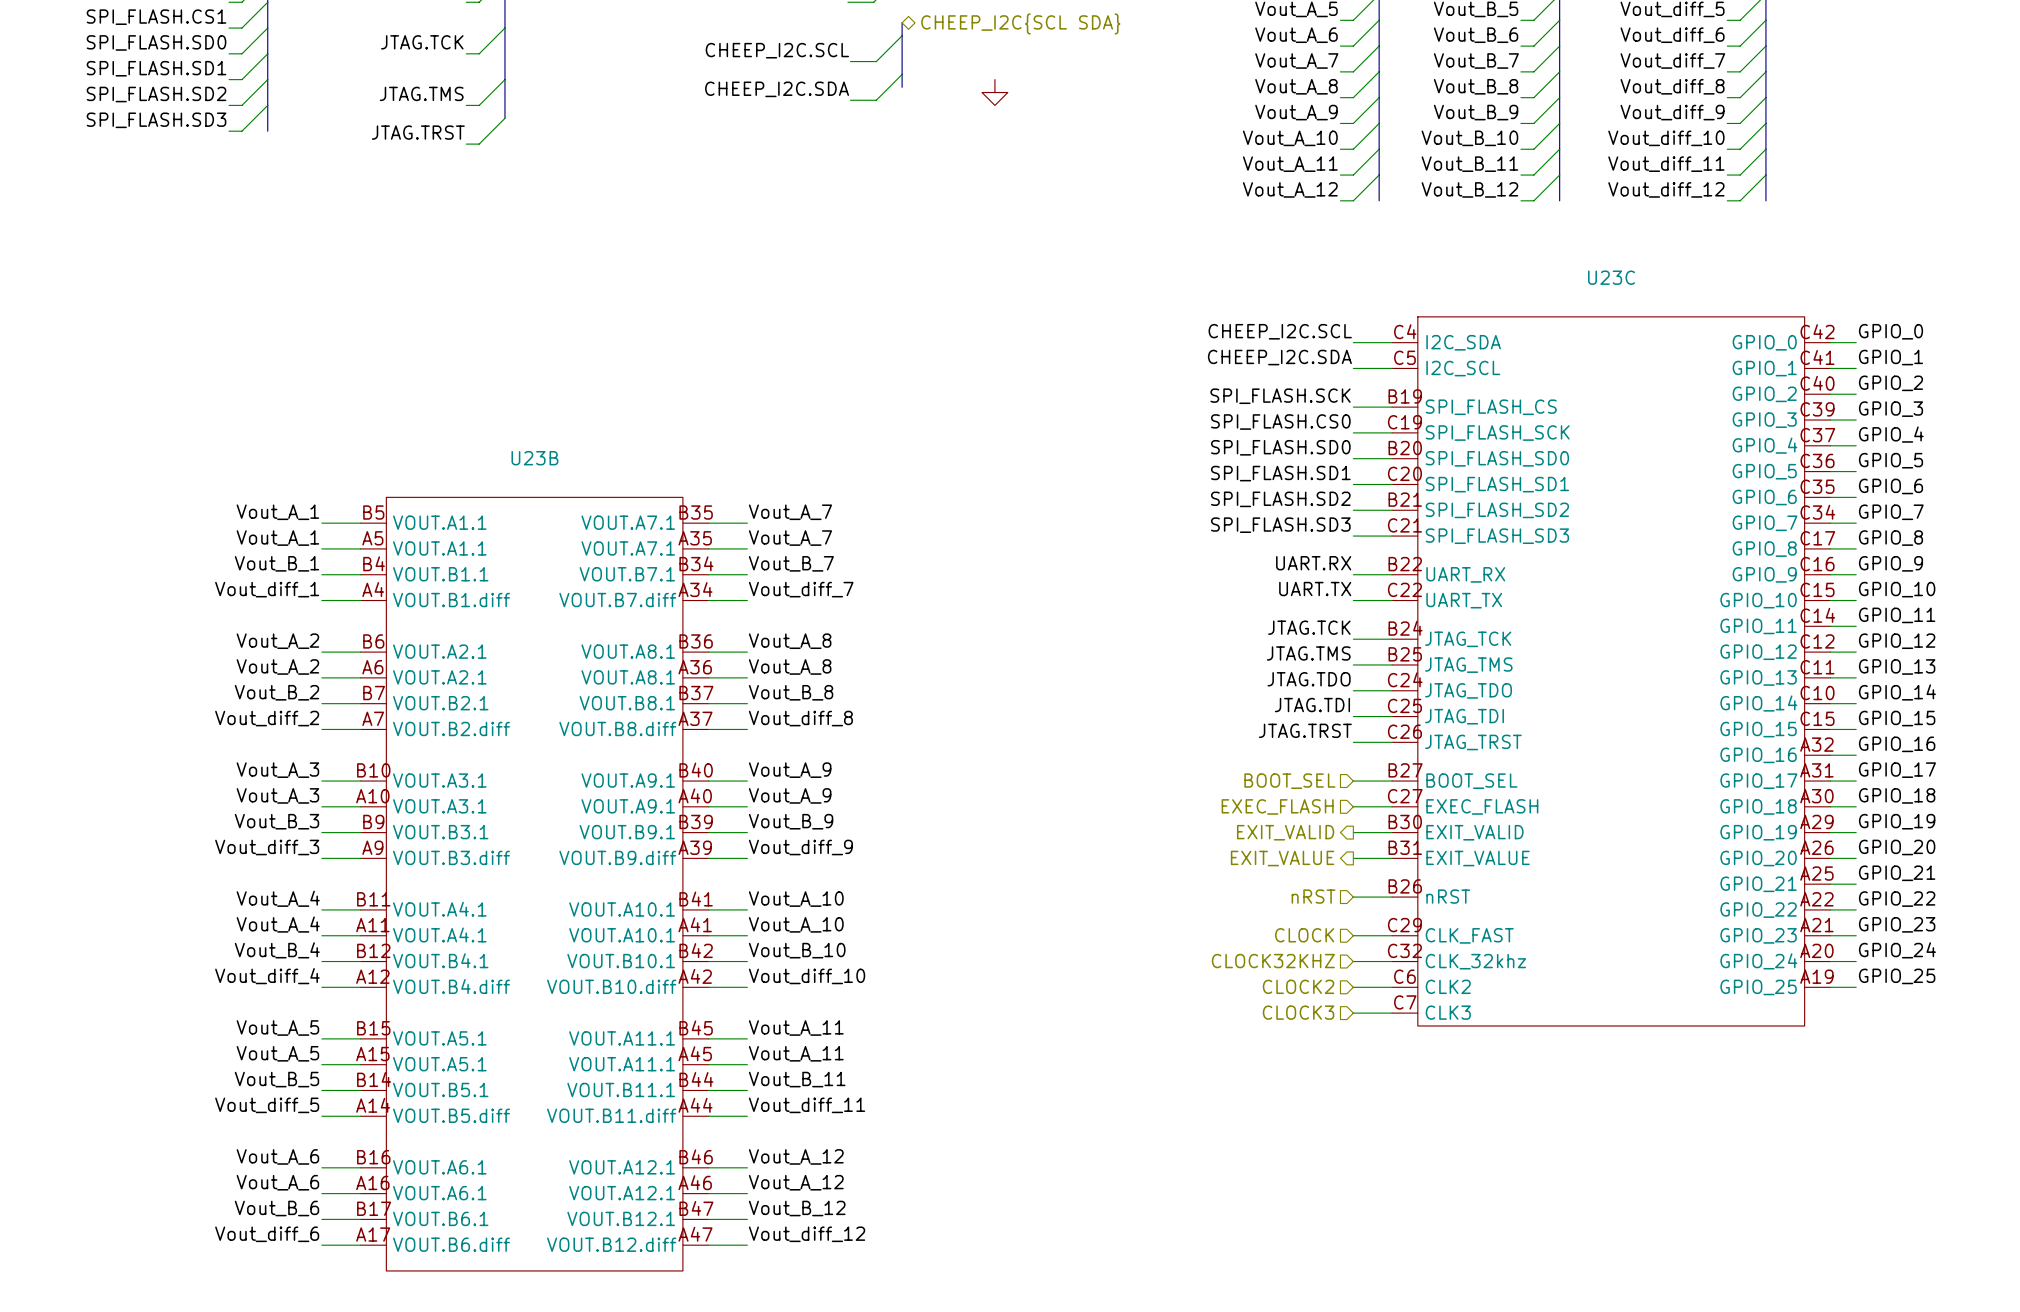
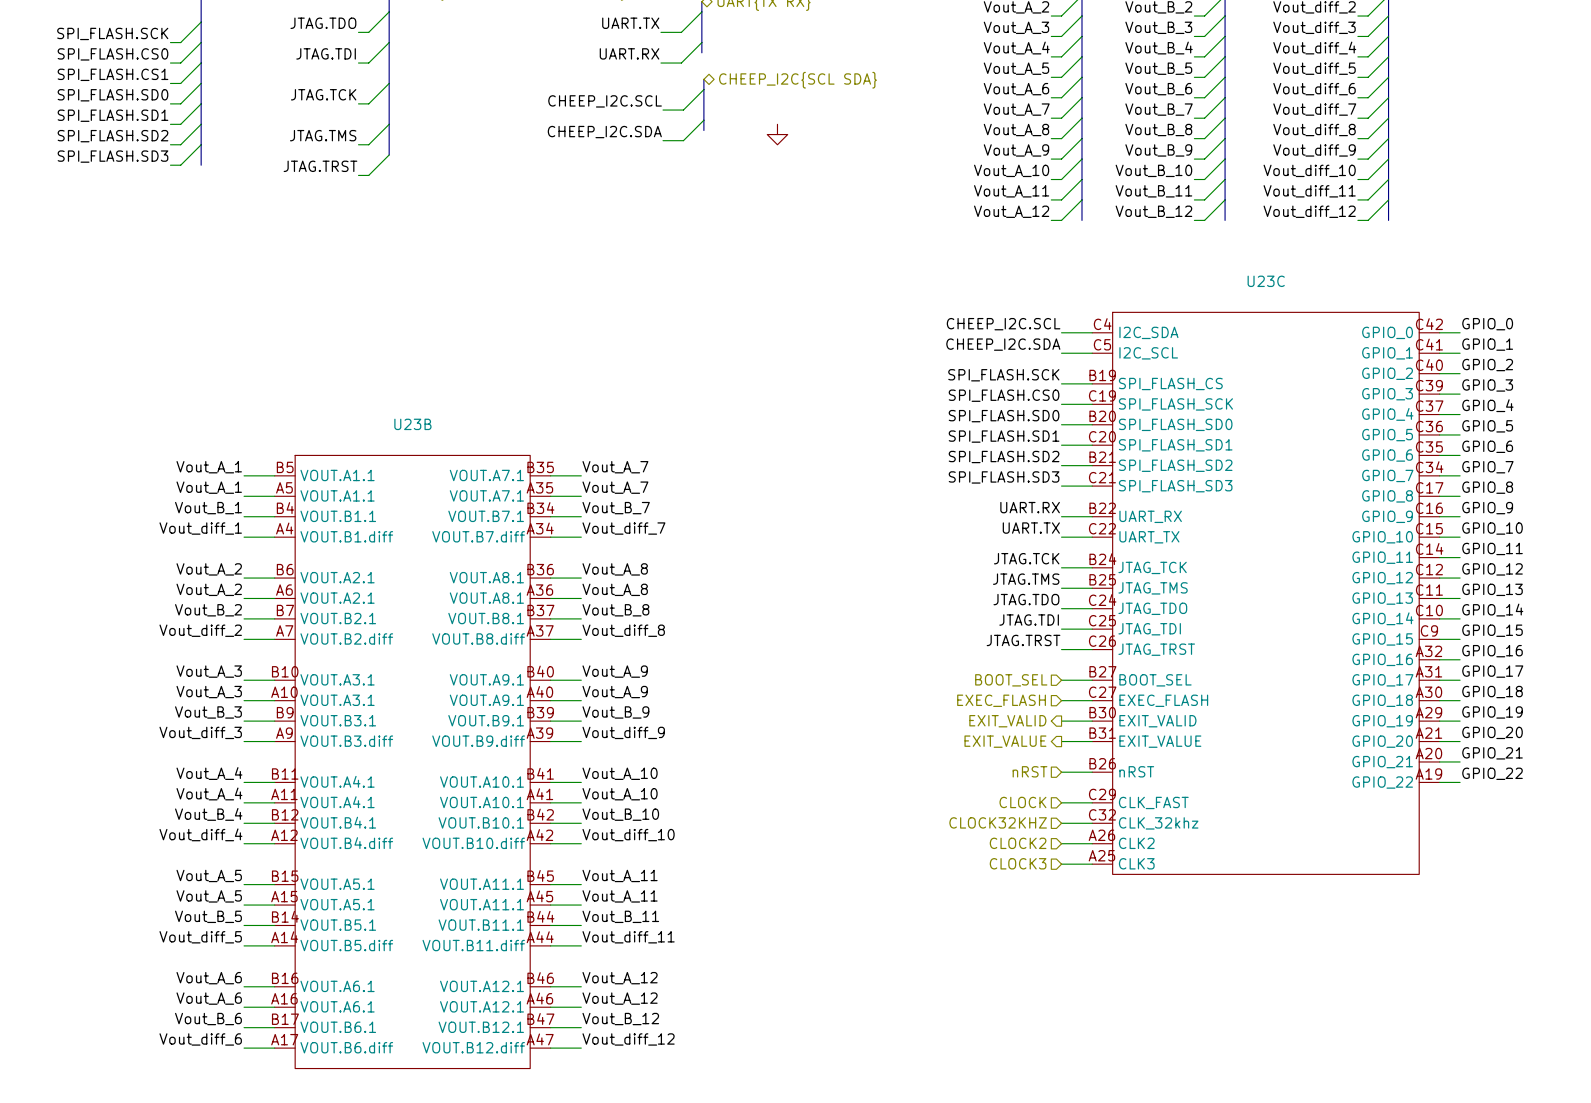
U23C symbol: [1392, 316, 1831, 1027] -> [1092, 312, 1440, 875]
label: GPIO_23 (1897, 924) -> none
wire: (1830, 935) (1856, 935) -> none
label: GPIO_24 (1897, 950) -> none
wire: (1830, 961) (1856, 961) -> none
label: GPIO_25 (1897, 976) -> none
wire: (1830, 987) (1856, 987) -> none

